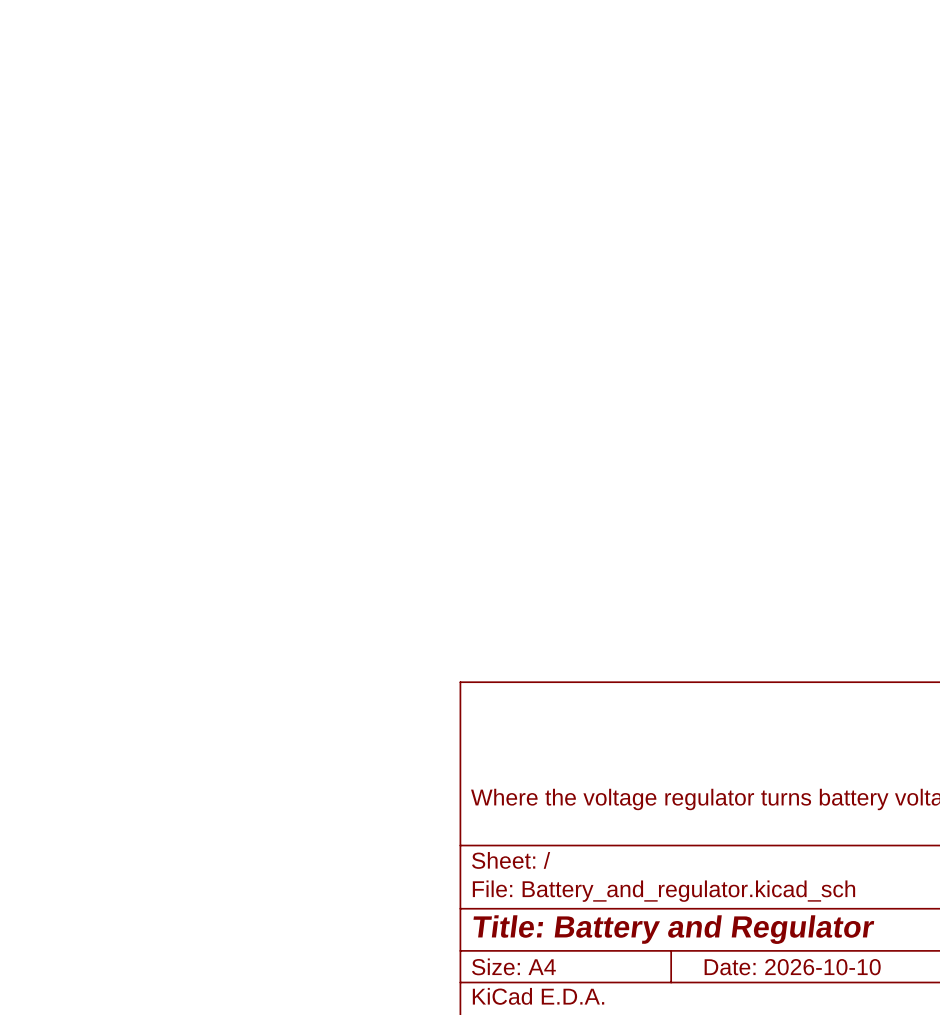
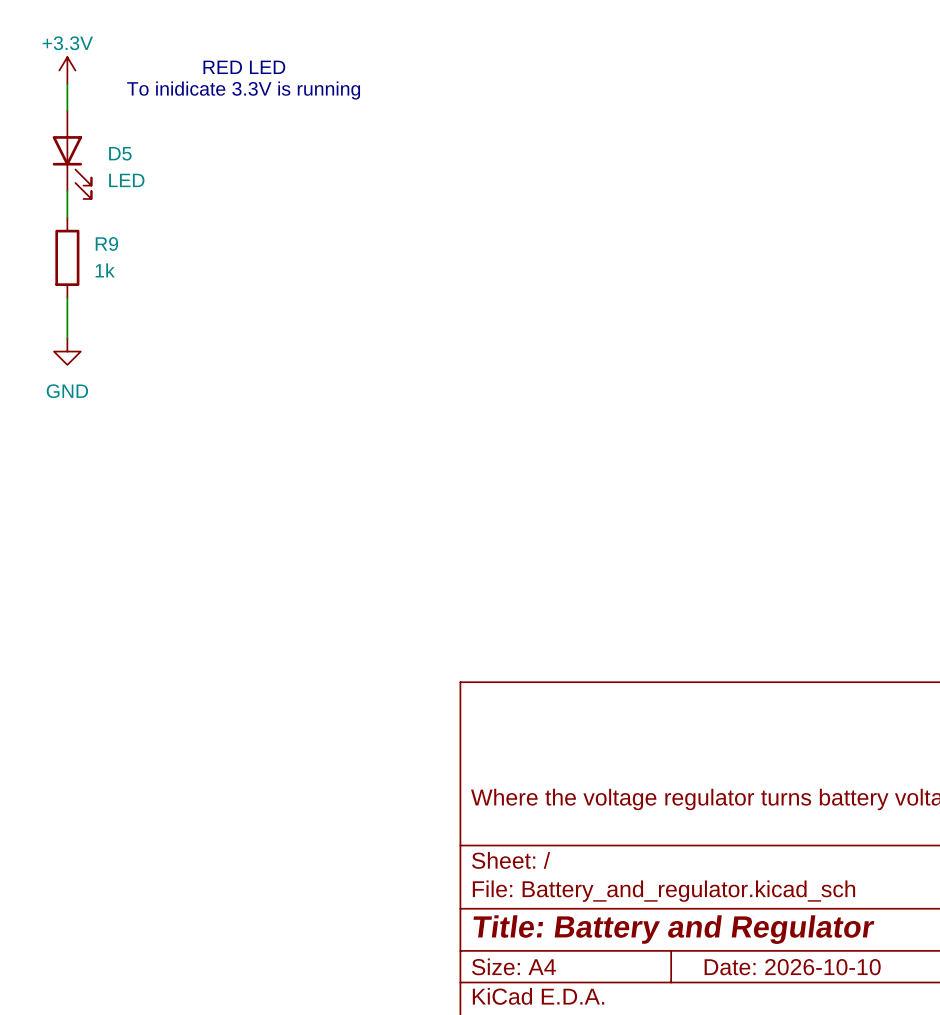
text: none -> RED LED (244, 67)
power symbol: none -> +3.3V (67, 70)
wire: none -> (67, 83) (67, 110)
text: none -> To inidicate 3.3V is running (243, 90)
D5: none -> LED (72, 154)
wire: none -> (67, 190) (67, 217)
R9: none -> 1k (67, 257)
wire: none -> (67, 298) (67, 338)
power symbol: none -> GND (67, 351)

